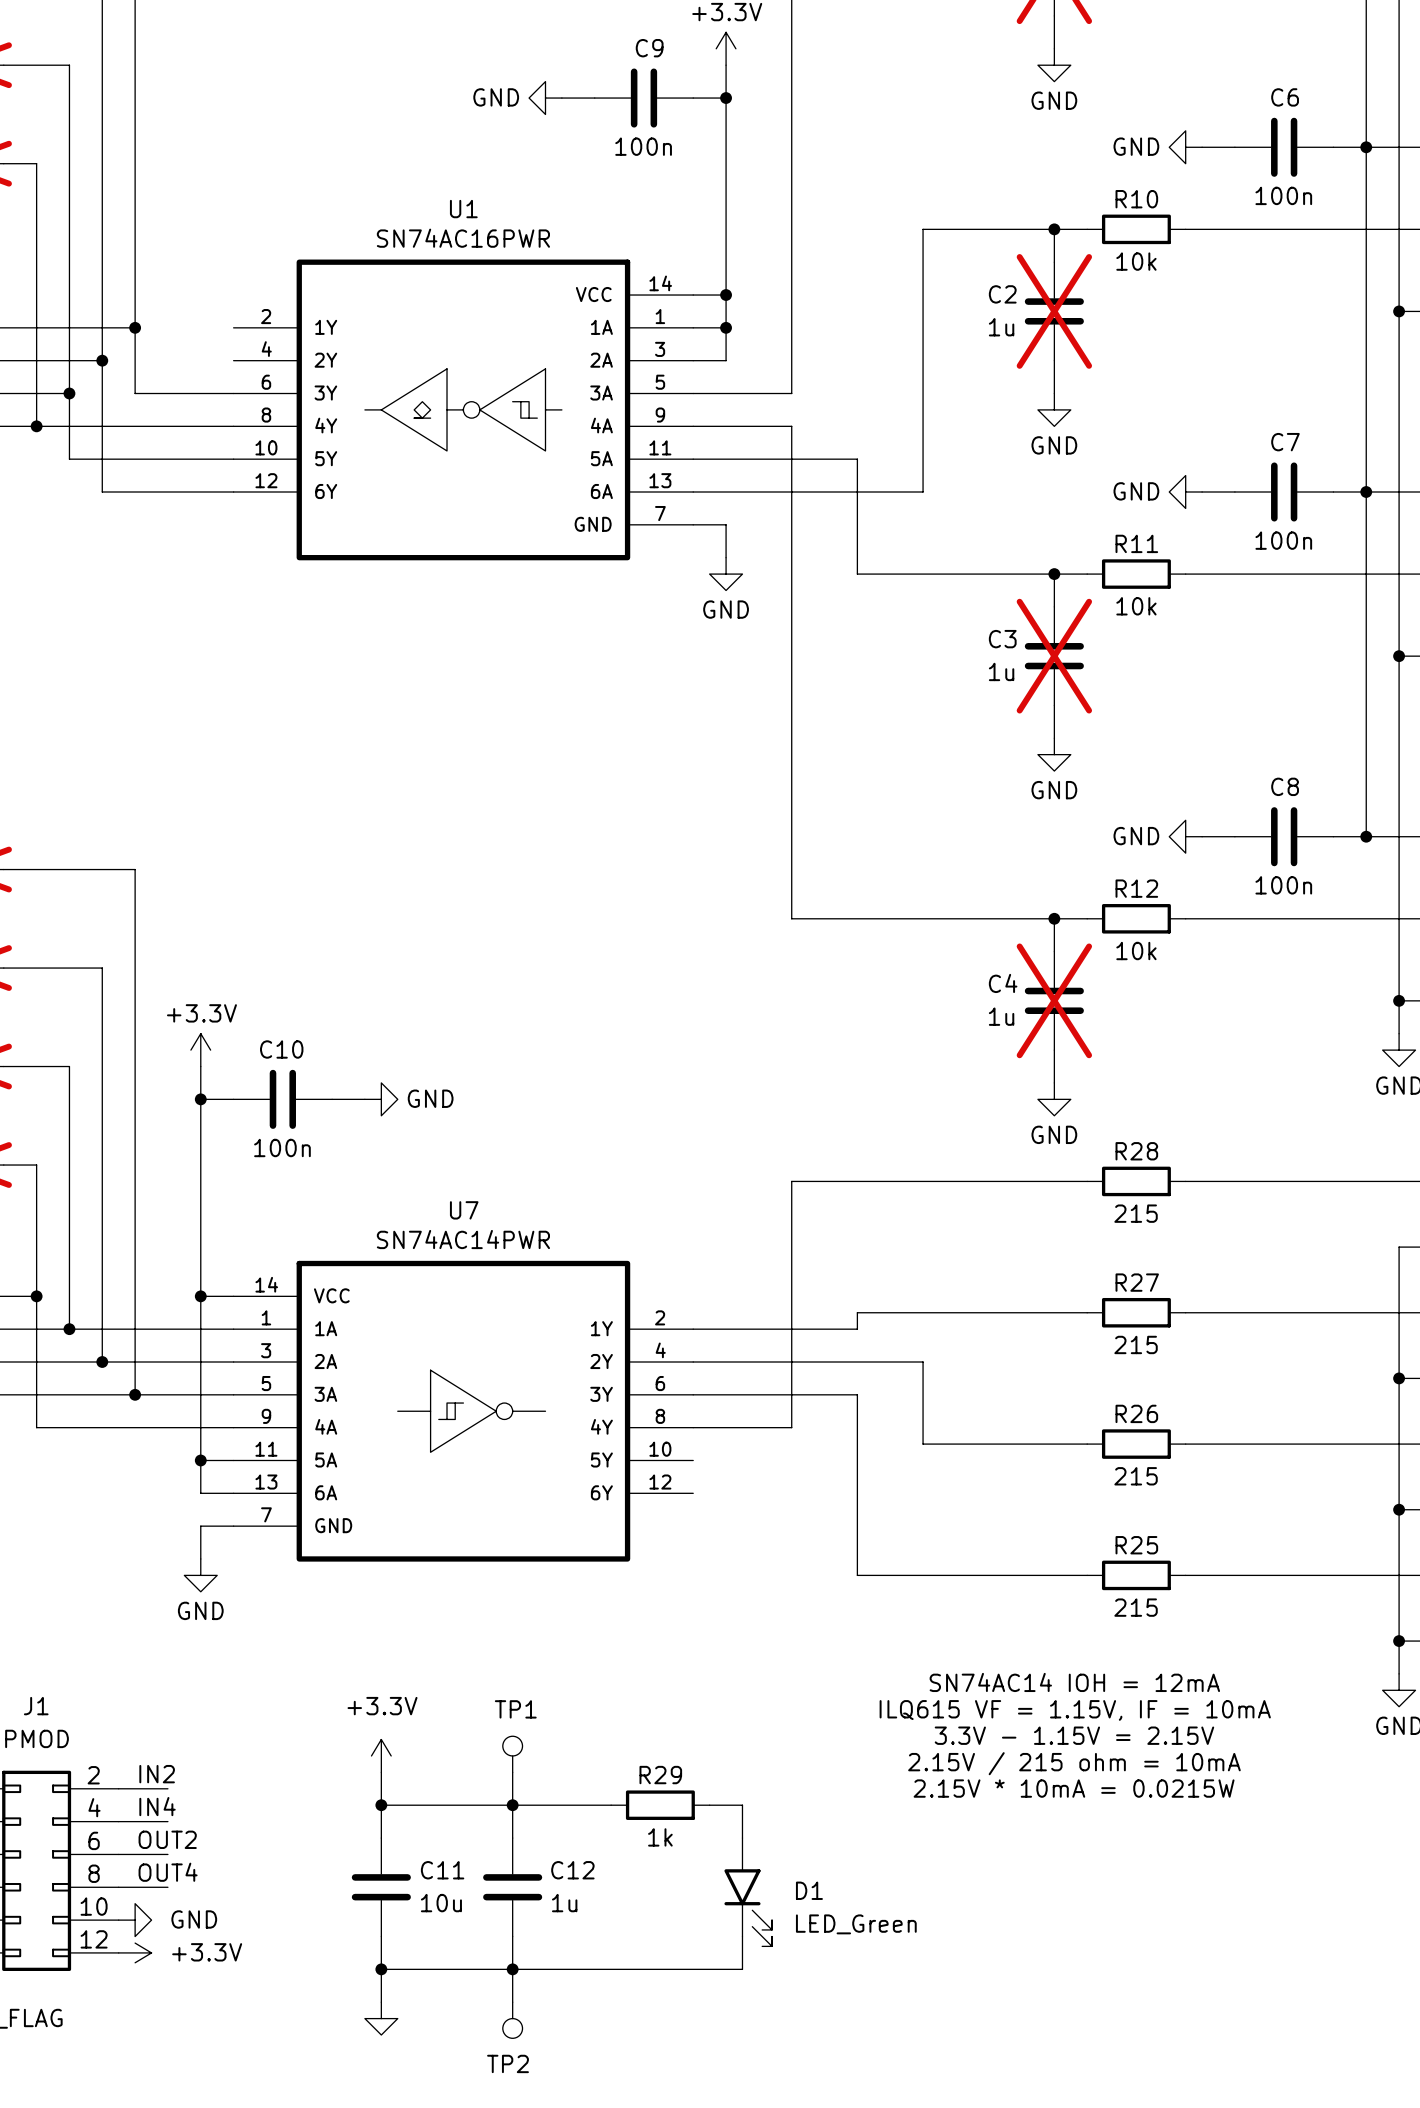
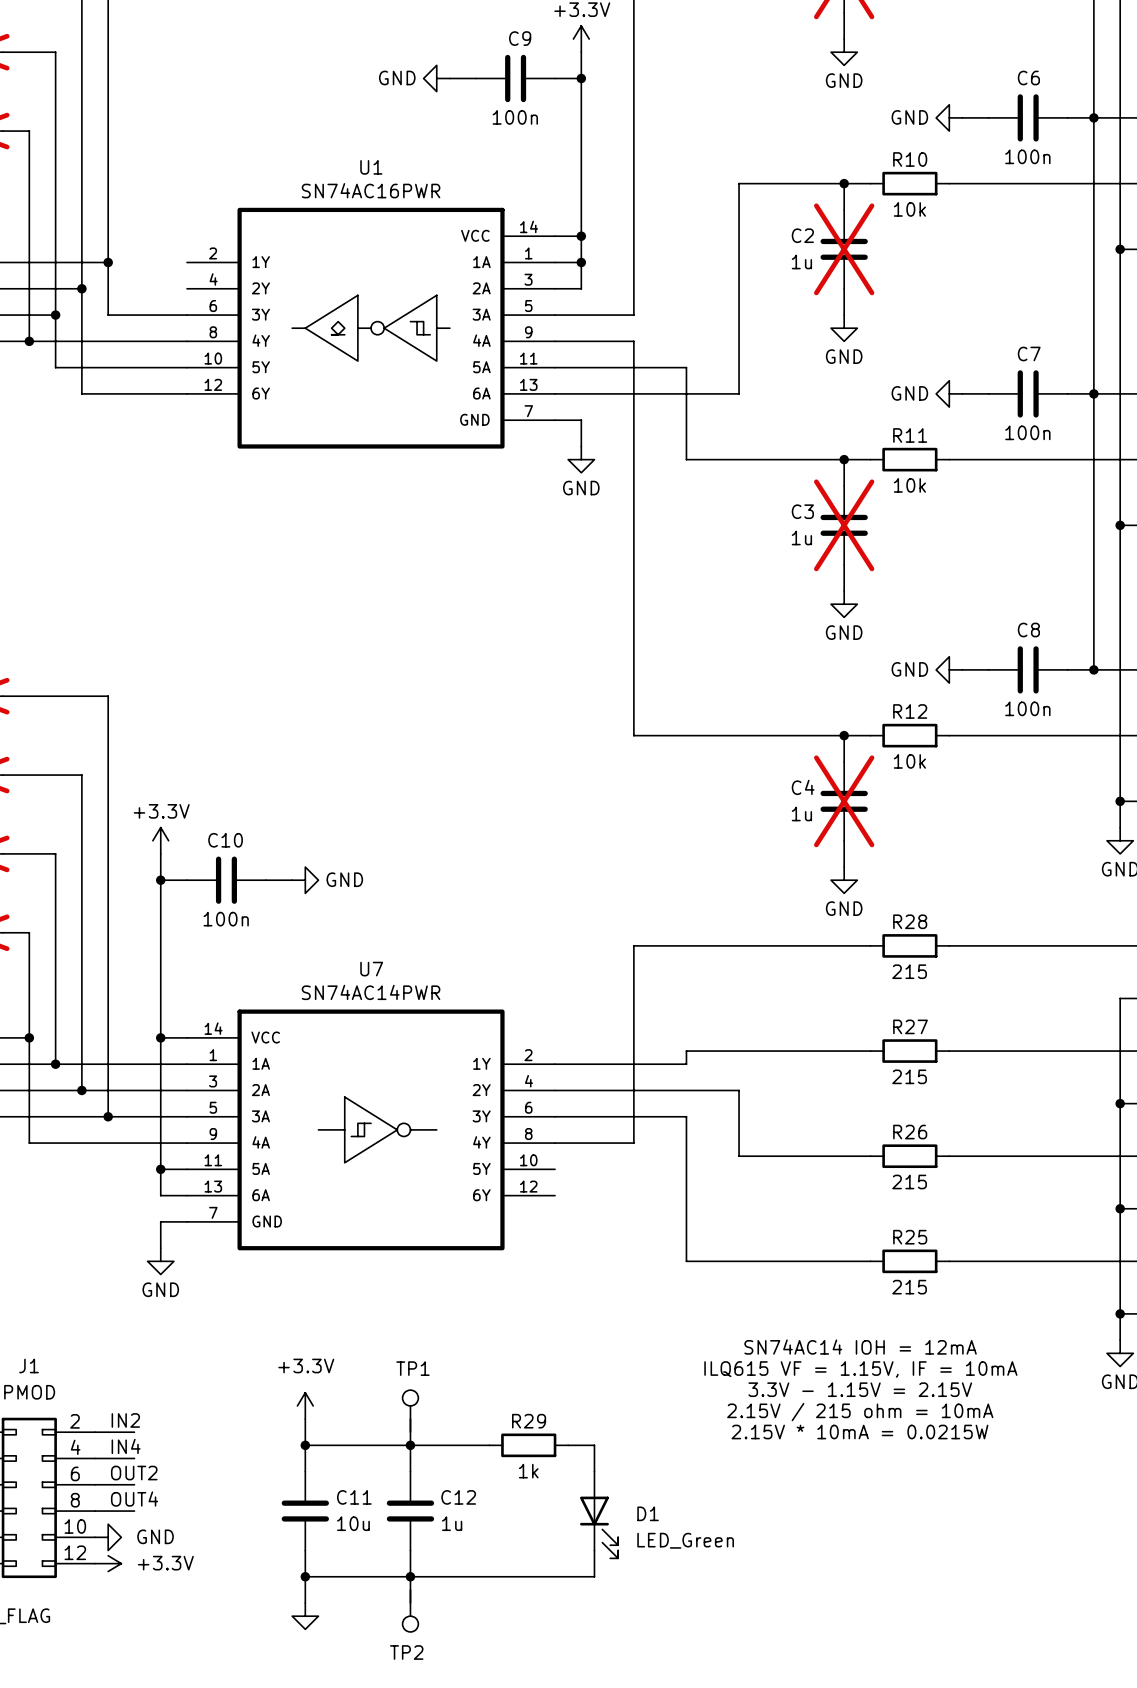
TP1 symbol: [502, 1736, 523, 1773] -> [402, 1390, 419, 1433]
D1 symbol: [724, 1838, 773, 1947] -> [580, 1471, 619, 1559]
TP2 symbol: [502, 2002, 523, 2039] -> [402, 1589, 419, 1632]

